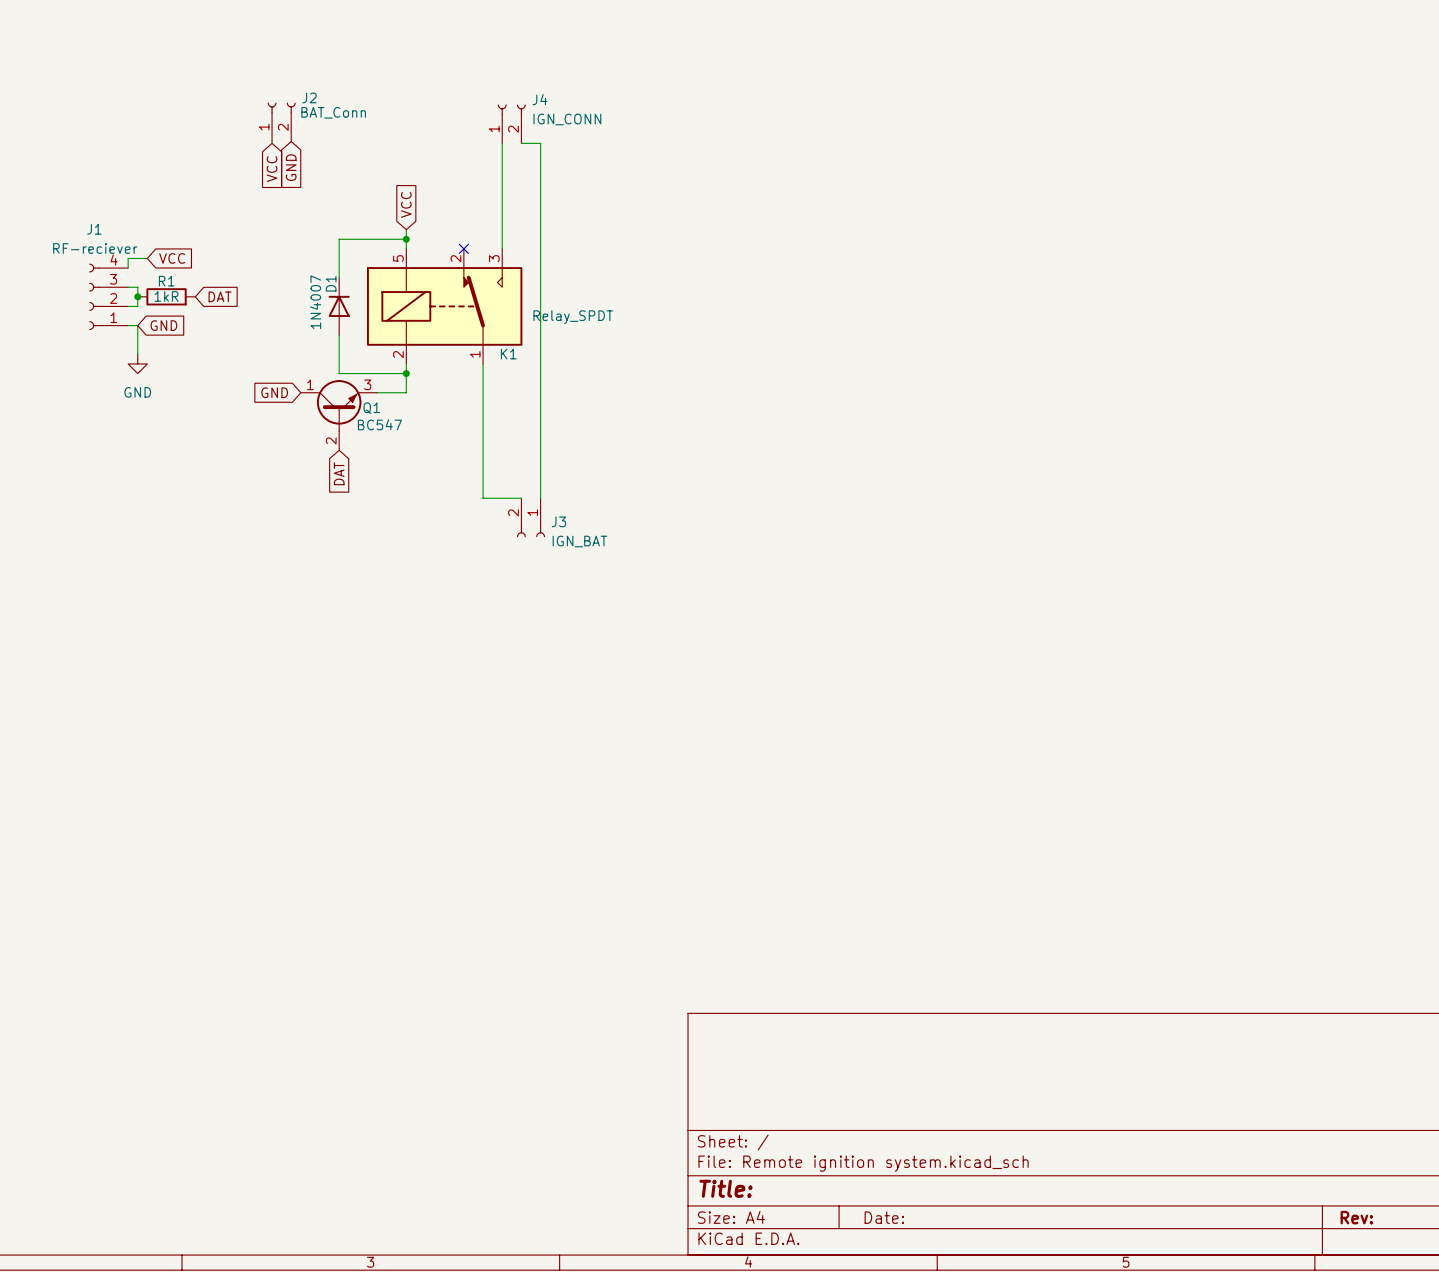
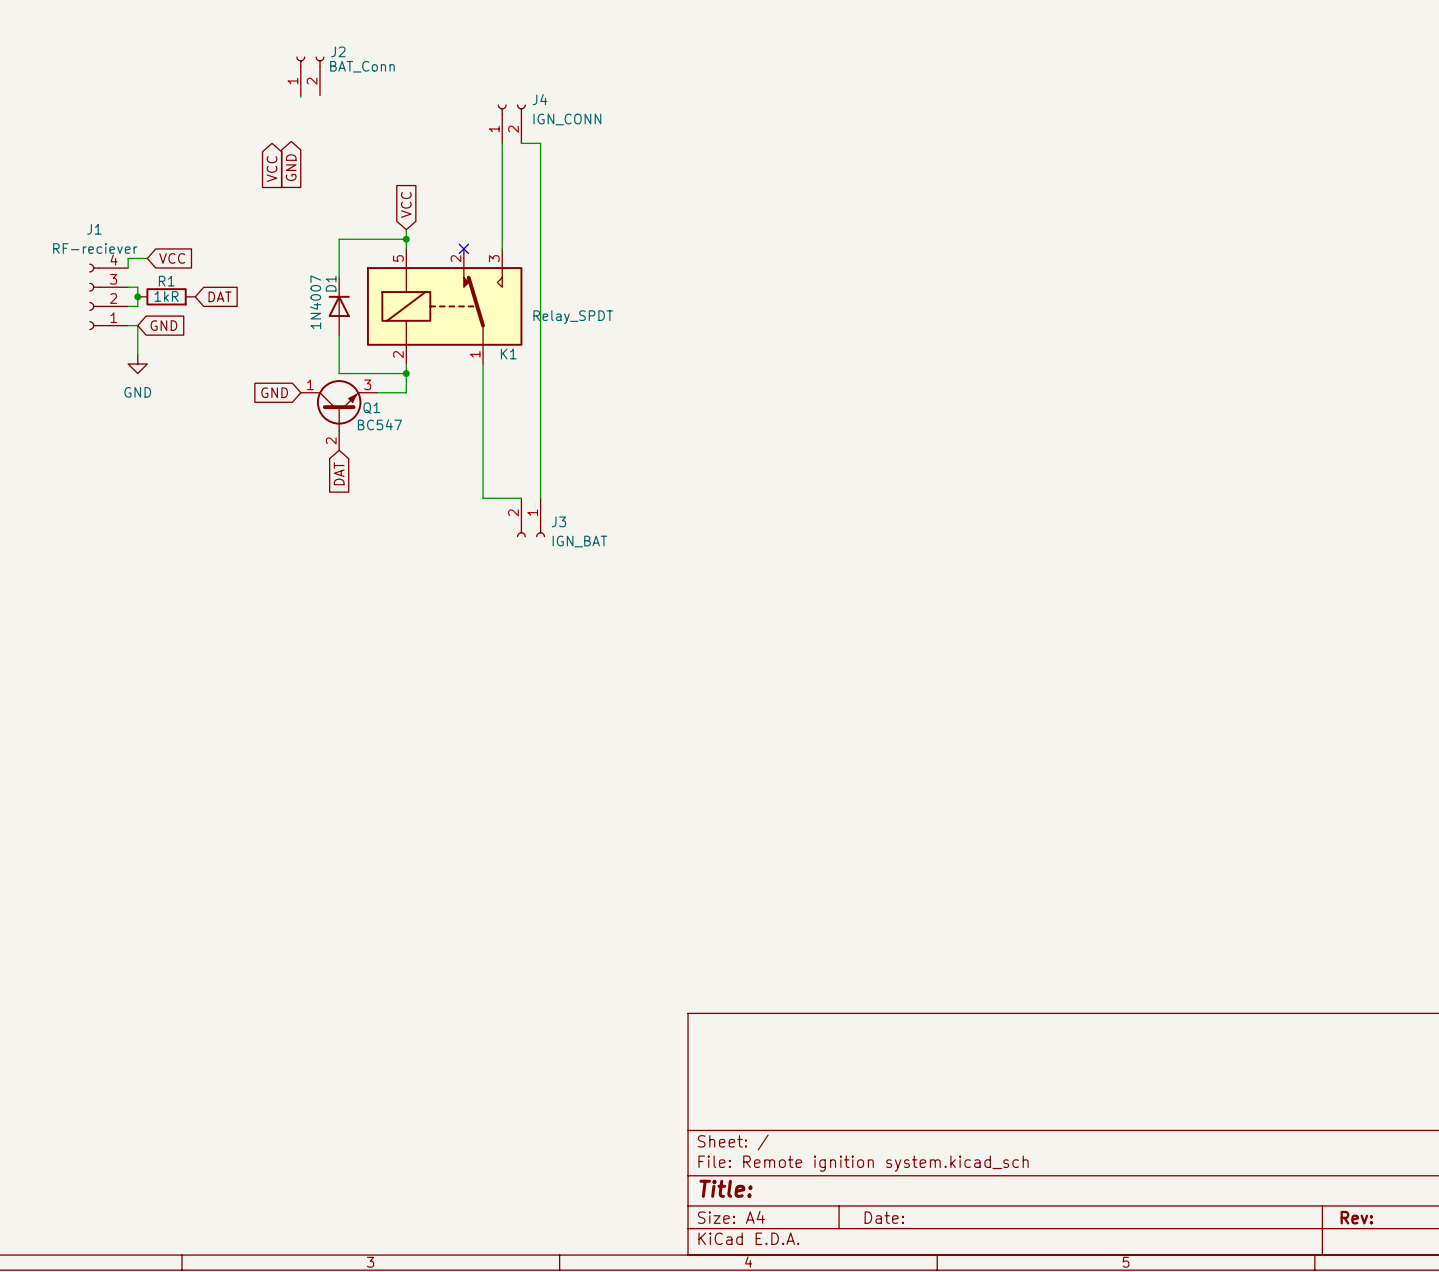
J2 position: (281, 122) -> (310, 75)
wire: (272, 141) (272, 143) -> (300, 95) (300, 97)

